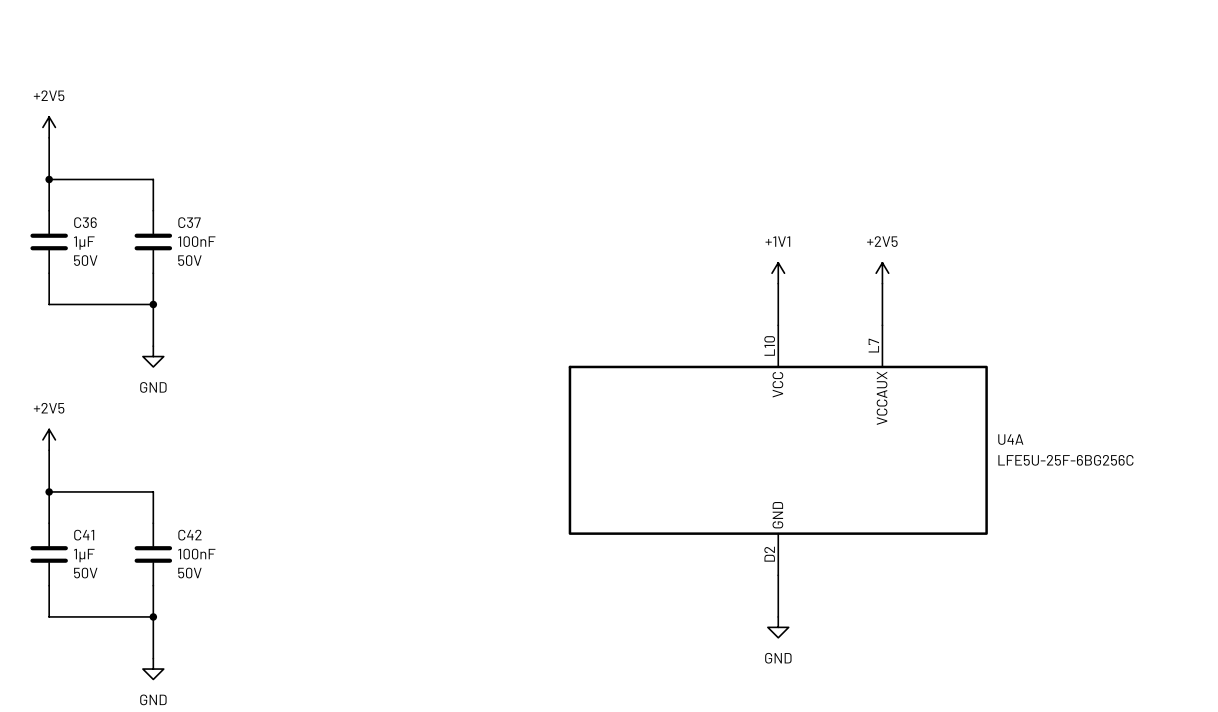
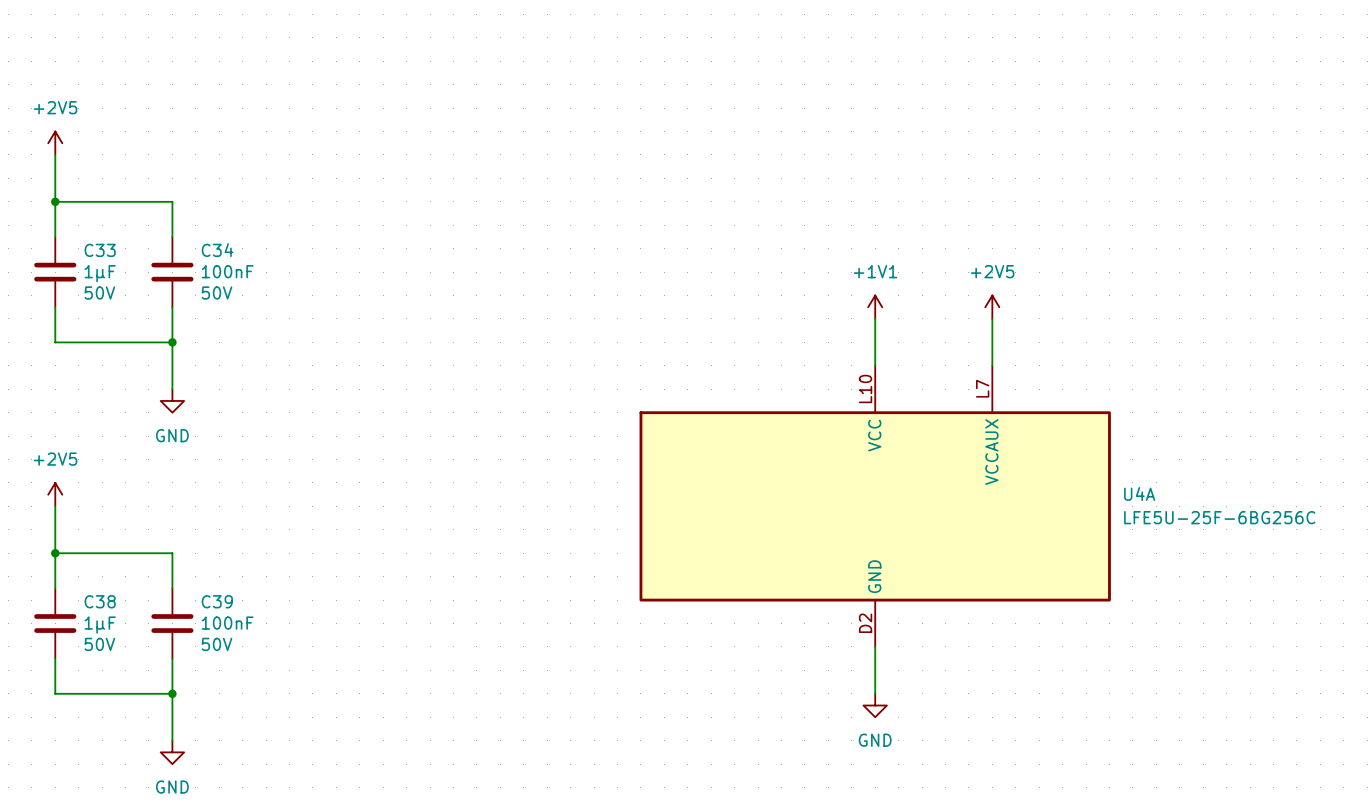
C36 name: C36 (85, 222) -> C33 (100, 250)
C37 name: C37 (189, 222) -> C34 (217, 250)
C41 name: C41 (84, 535) -> C38 (100, 601)
C42 name: C42 (189, 535) -> C39 (217, 601)

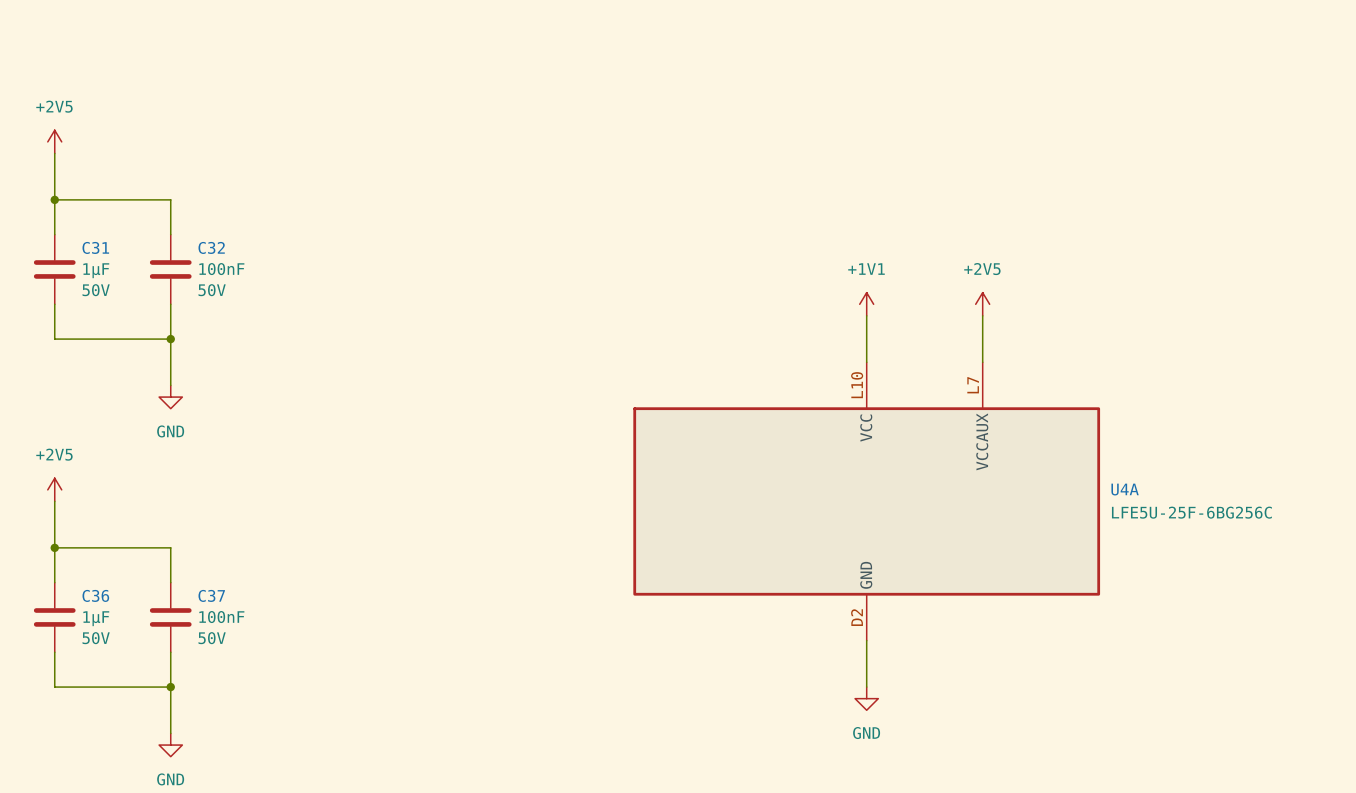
C33 name: C33 (100, 250) -> C31 (95, 247)
C34 name: C34 (217, 250) -> C32 (211, 247)
C38 name: C38 (100, 601) -> C36 (95, 595)
C39 name: C39 (217, 601) -> C37 (211, 595)

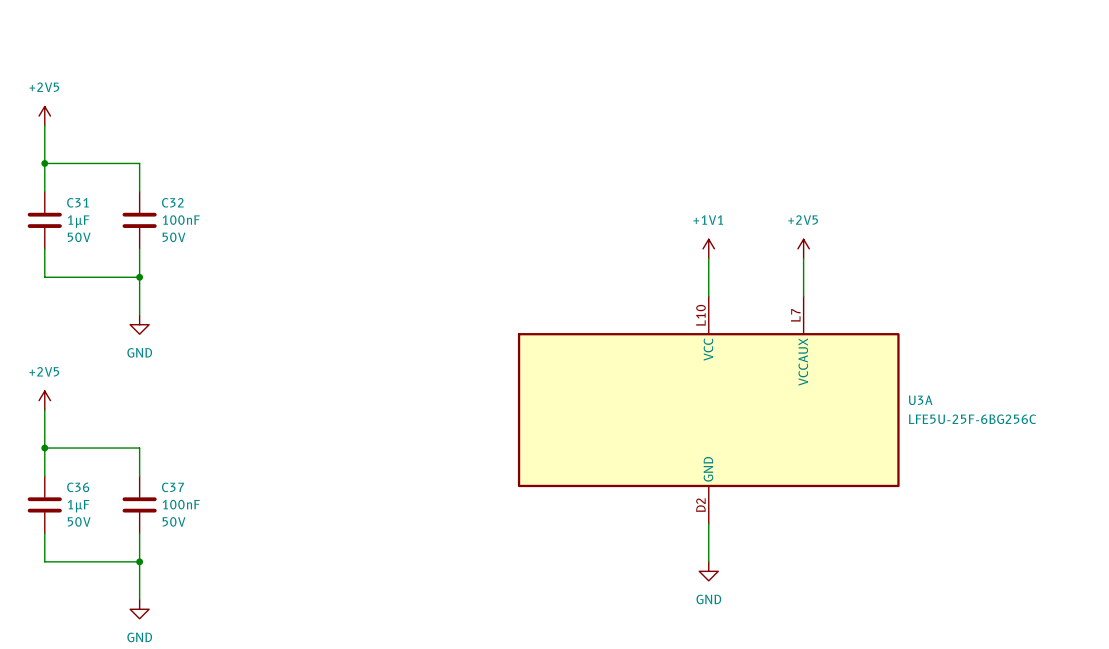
U4A name: U4A (1125, 489) -> U3A (920, 400)

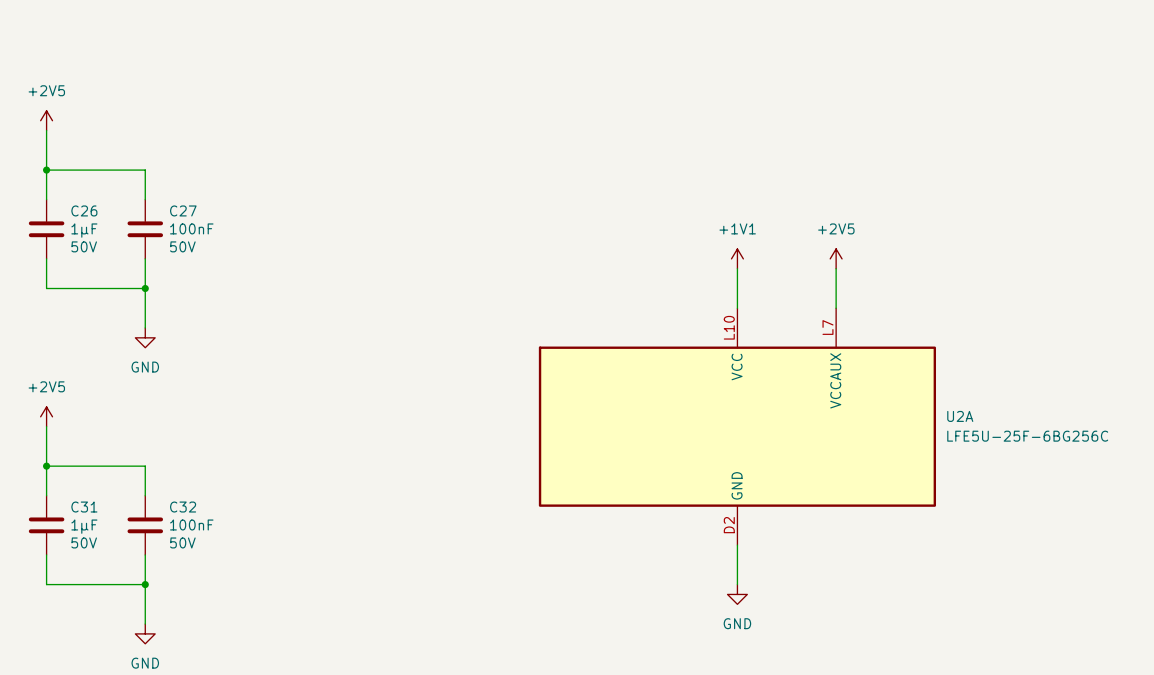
C31 name: C31 (77, 202) -> C26 (84, 210)
C32 name: C32 (172, 202) -> C27 (183, 210)
U3A name: U3A (920, 400) -> U2A (960, 416)
C36 name: C36 (78, 487) -> C31 (84, 507)
C37 name: C37 (172, 487) -> C32 (183, 507)

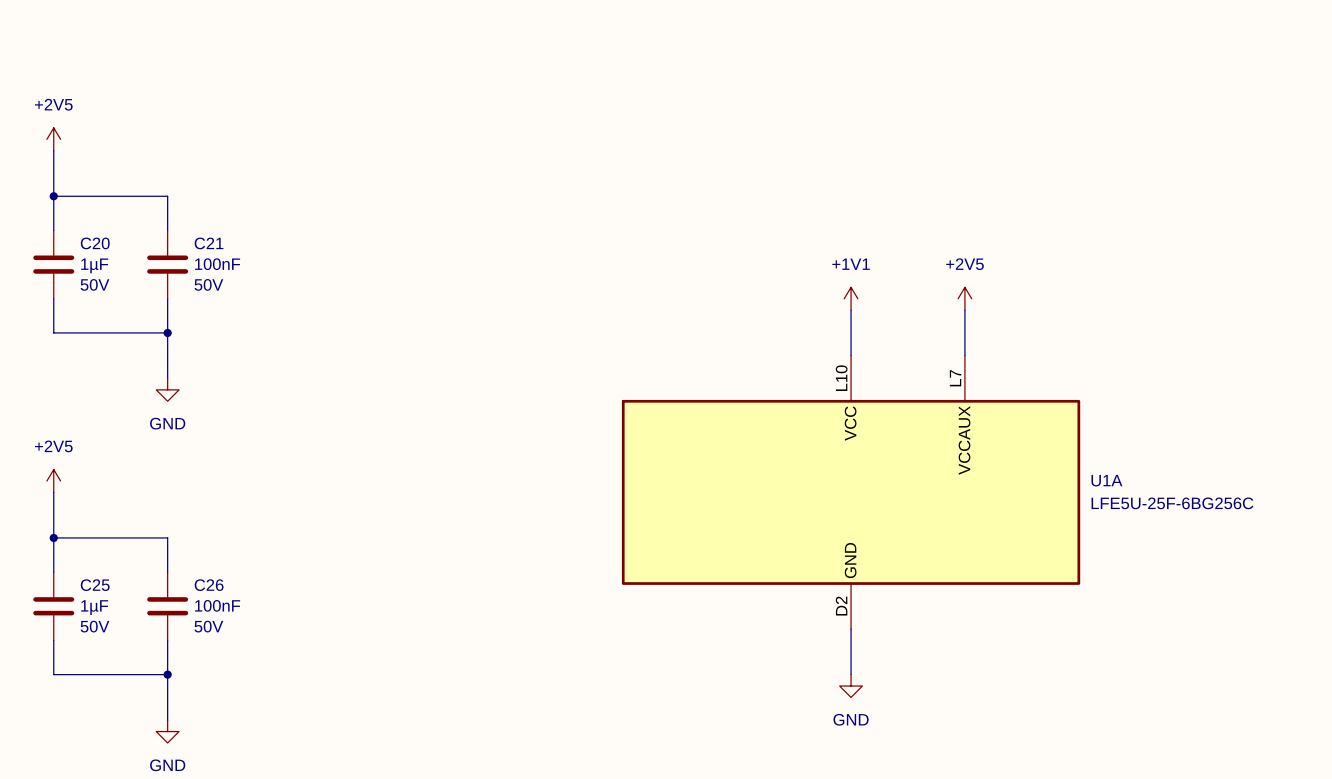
C26 name: C26 (84, 210) -> C20 (95, 243)
C27 name: C27 (183, 210) -> C21 (209, 243)
U2A name: U2A (960, 416) -> U1A (1106, 480)
C31 name: C31 (84, 507) -> C25 (95, 585)
C32 name: C32 (183, 507) -> C26 (209, 585)

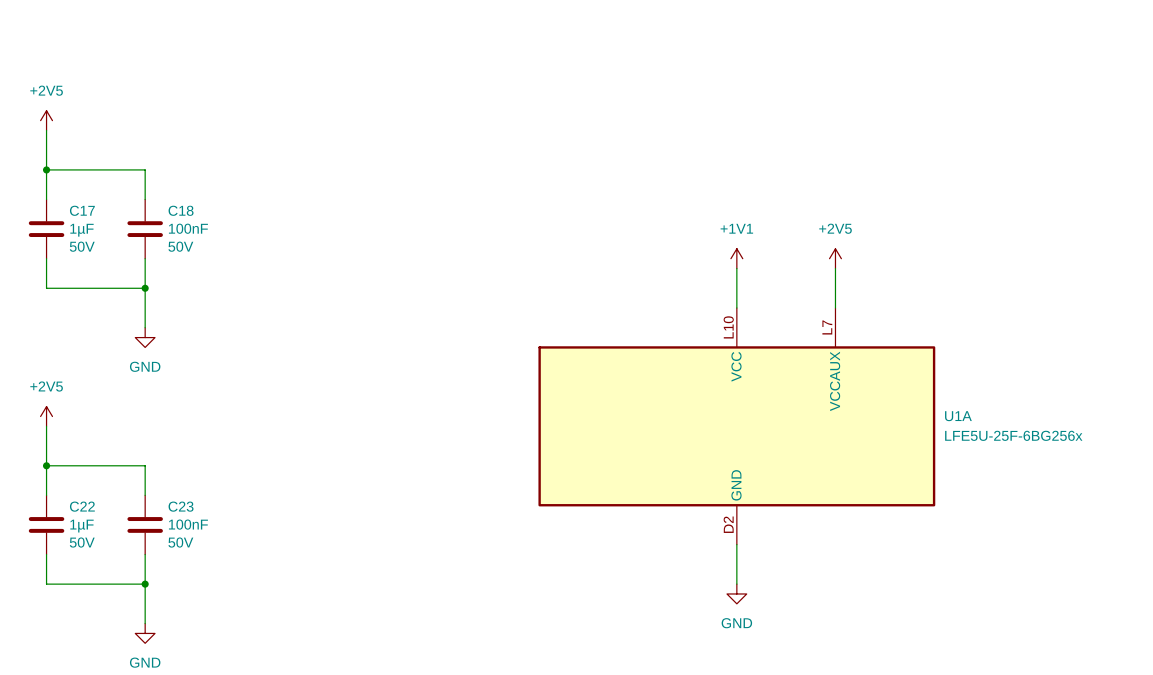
C20 name: C20 (95, 243) -> C17 (82, 210)
C21 name: C21 (209, 243) -> C18 (181, 210)
U1A value: LFE5U-25F-6BG256C (1172, 503) -> LFE5U-25F-6BG256x (1013, 435)
C25 name: C25 (95, 585) -> C22 (82, 506)
C26 name: C26 (209, 585) -> C23 (181, 506)

